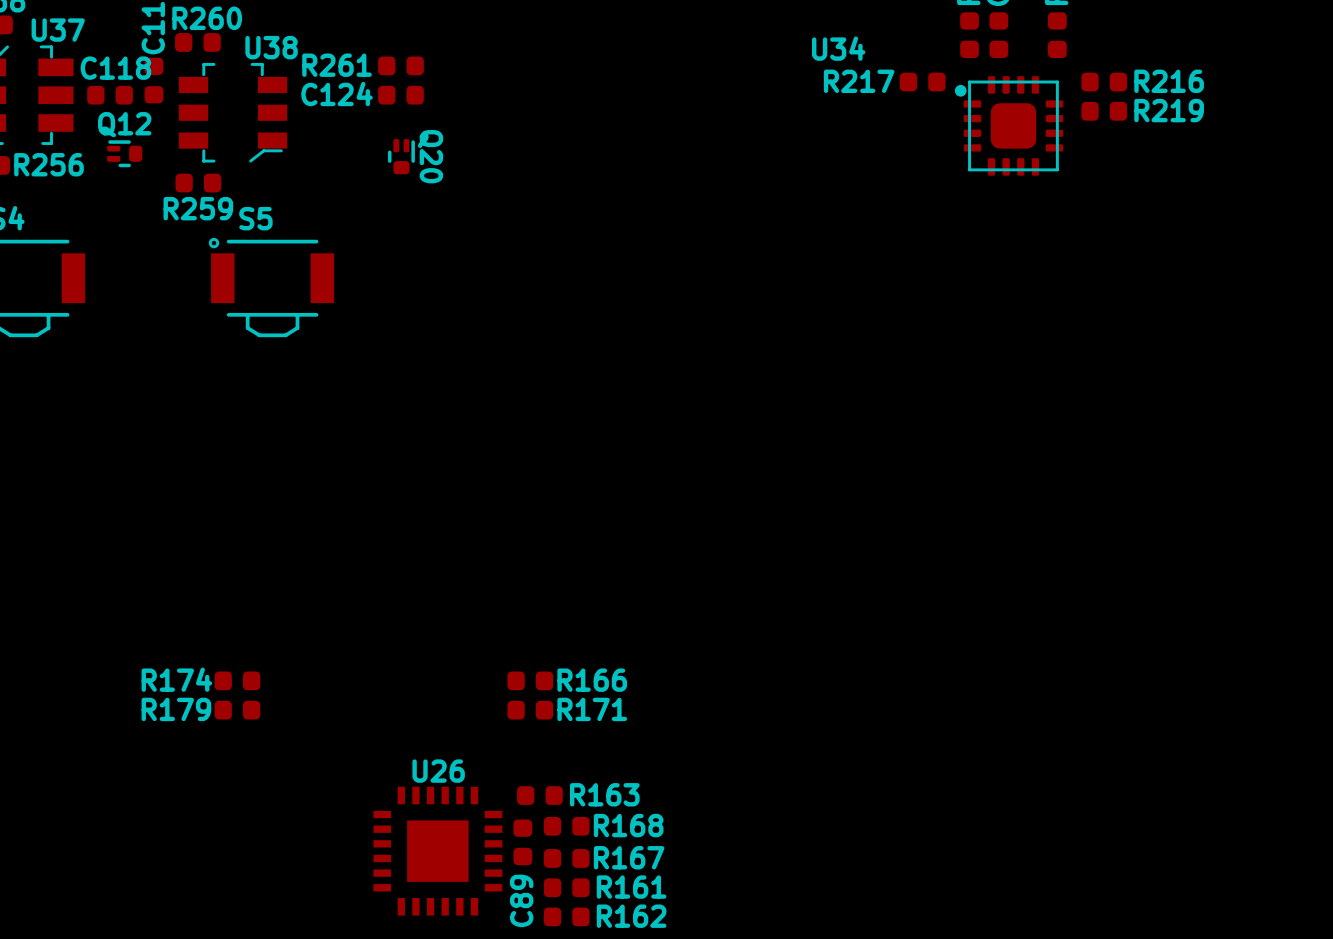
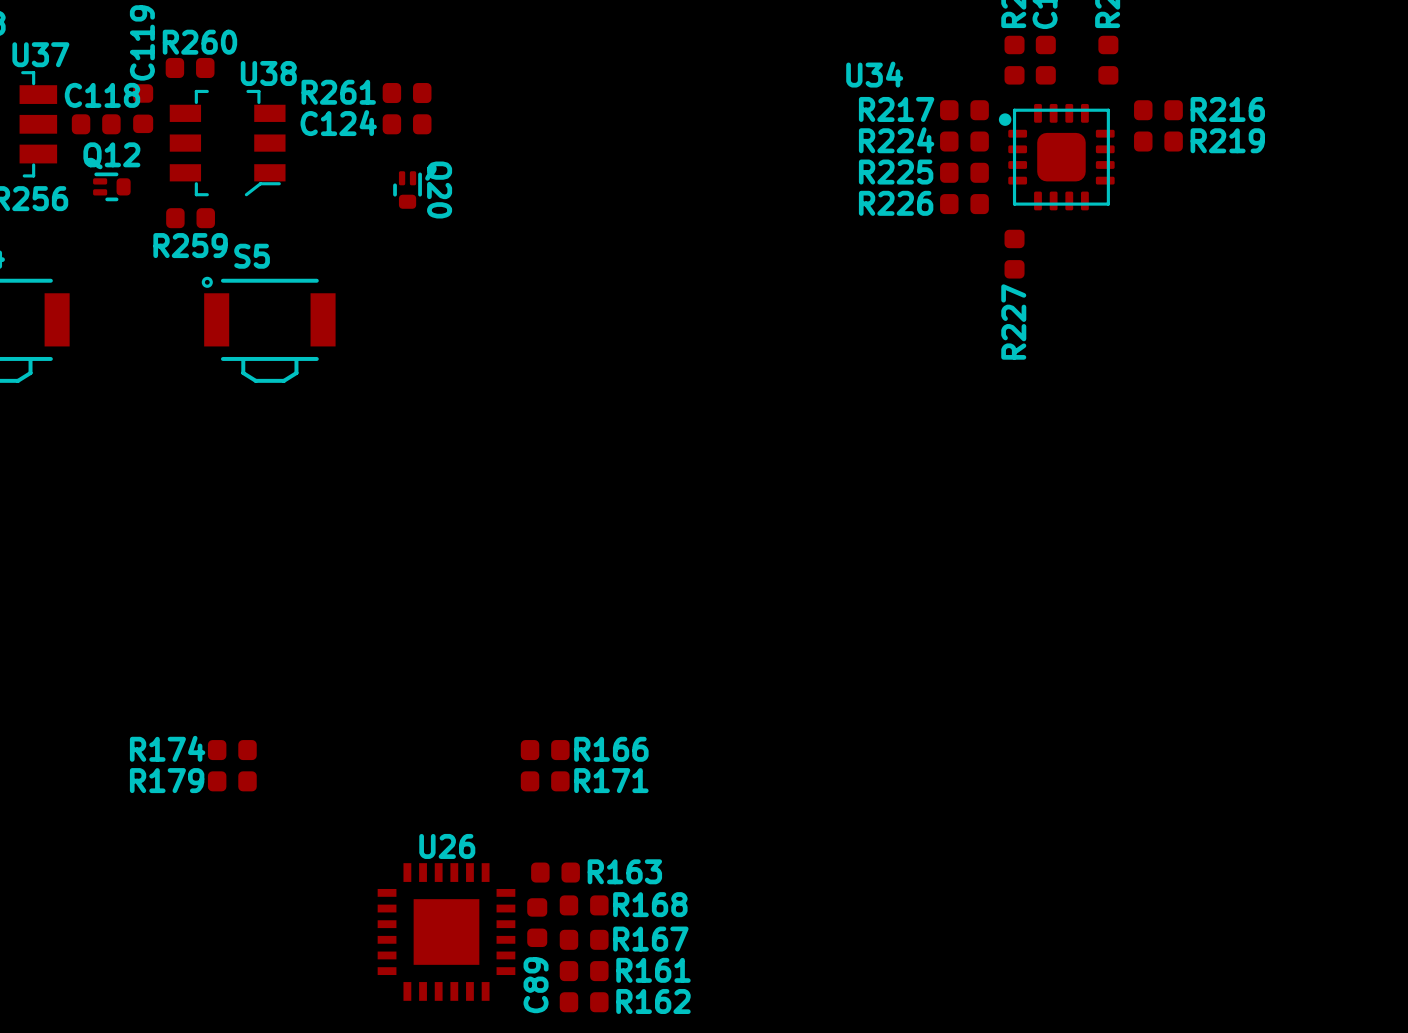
R224: none -> (964, 141)
R225: none -> (964, 172)
R226: none -> (964, 204)
R227: none -> (1014, 254)

